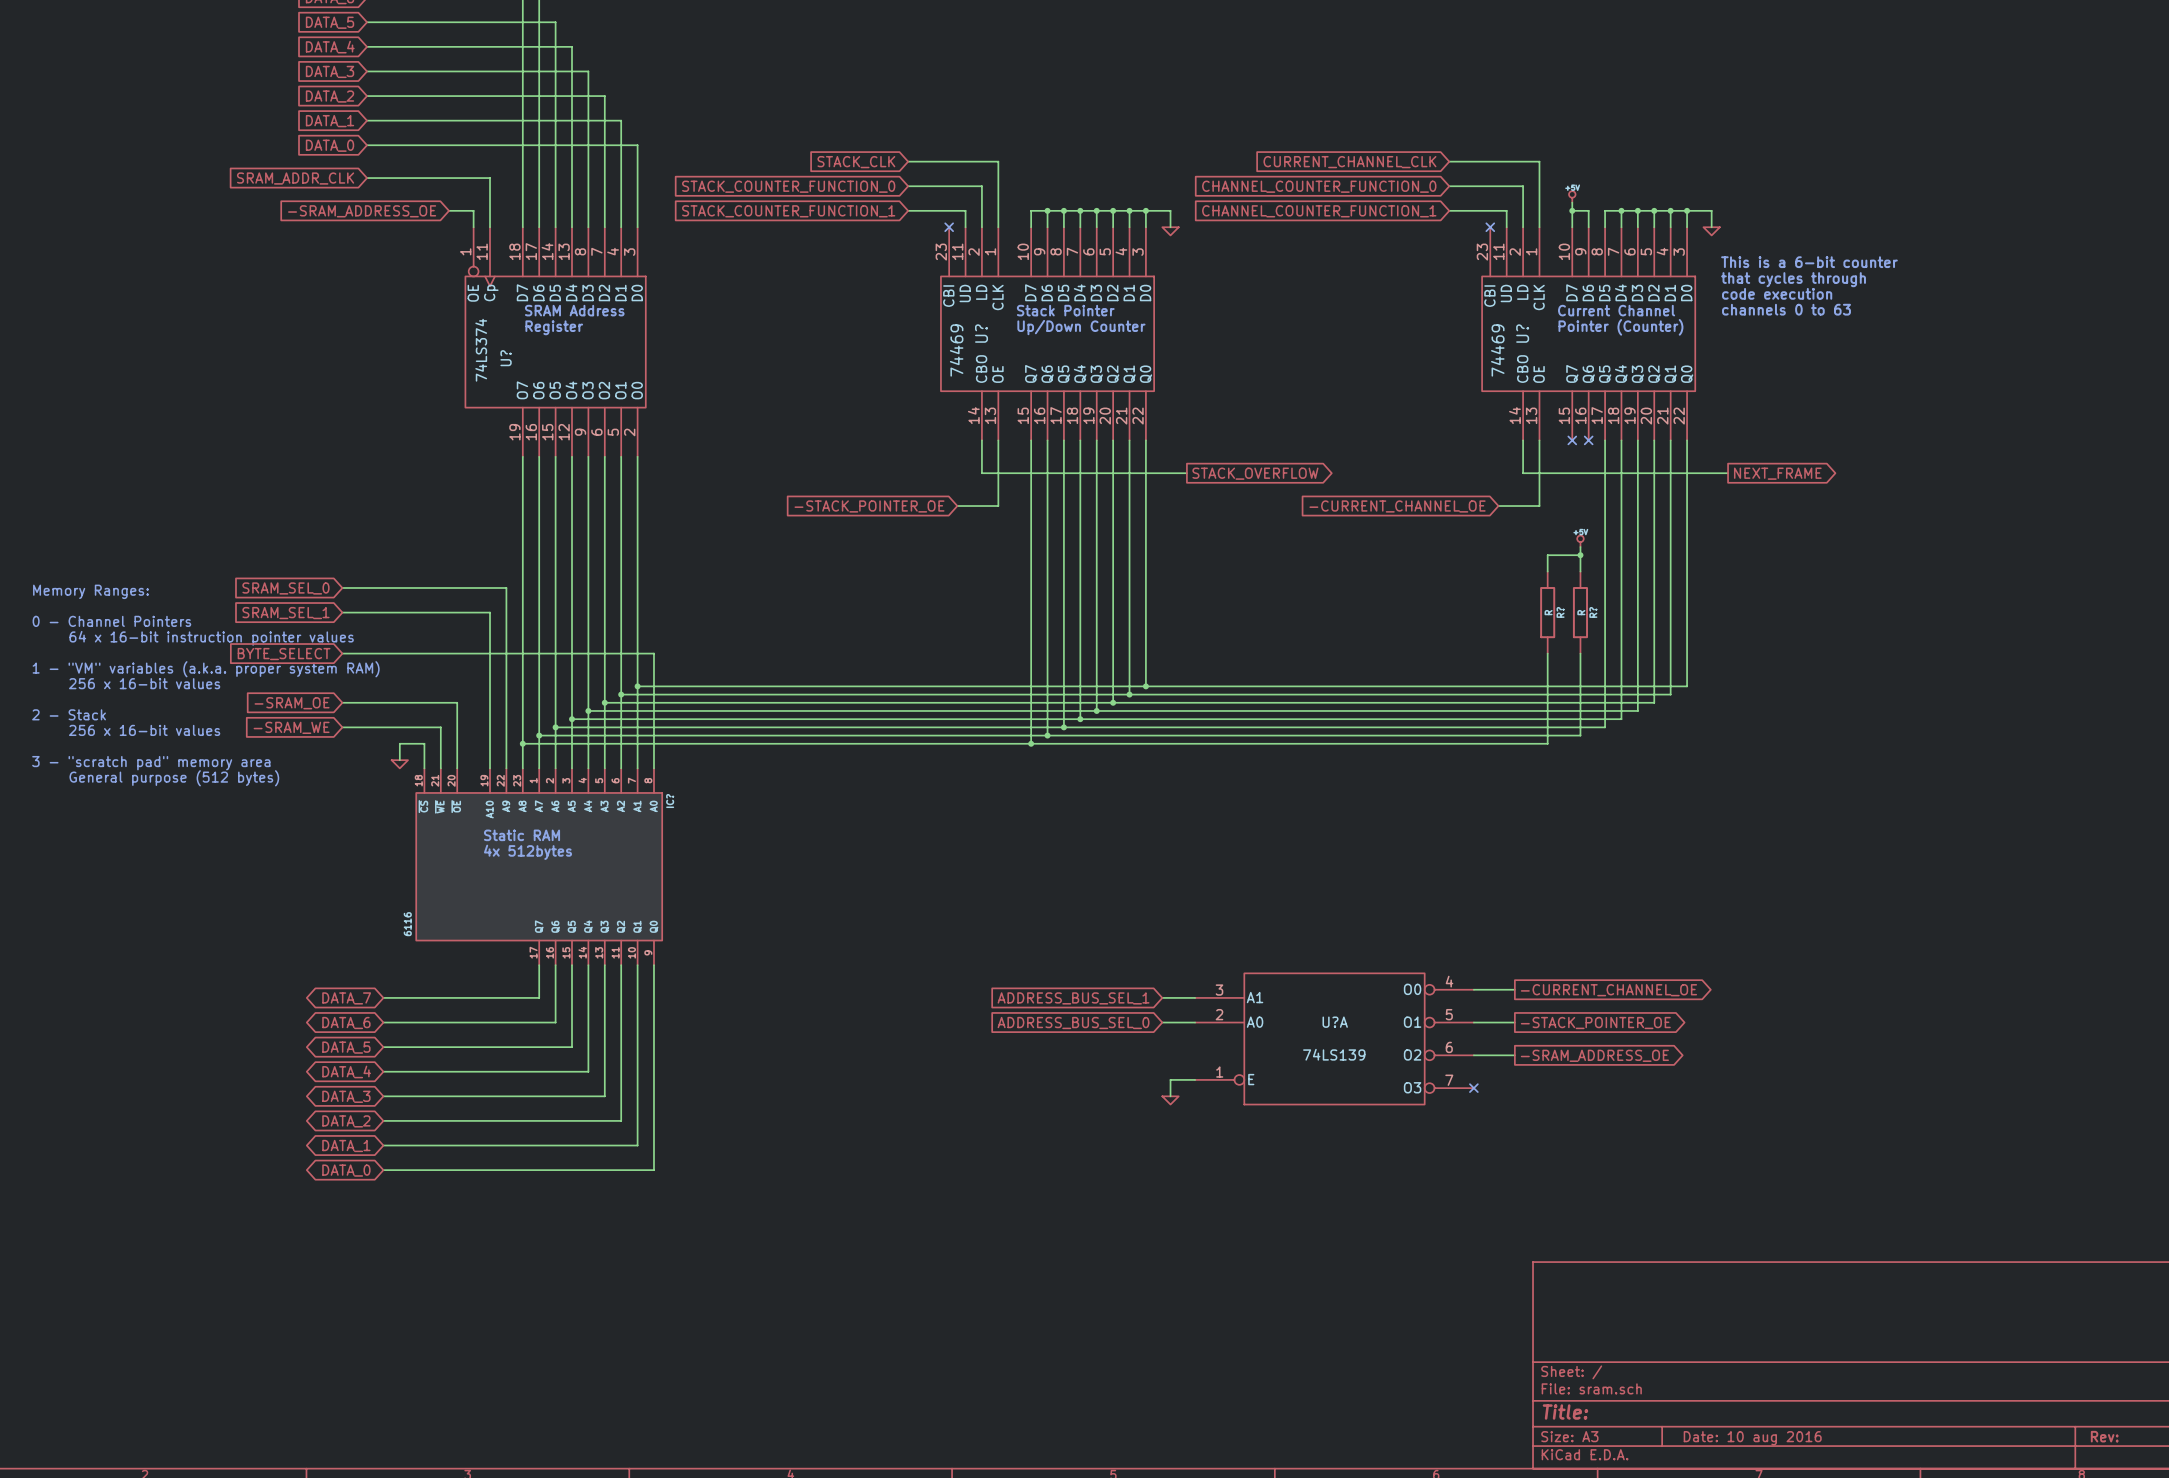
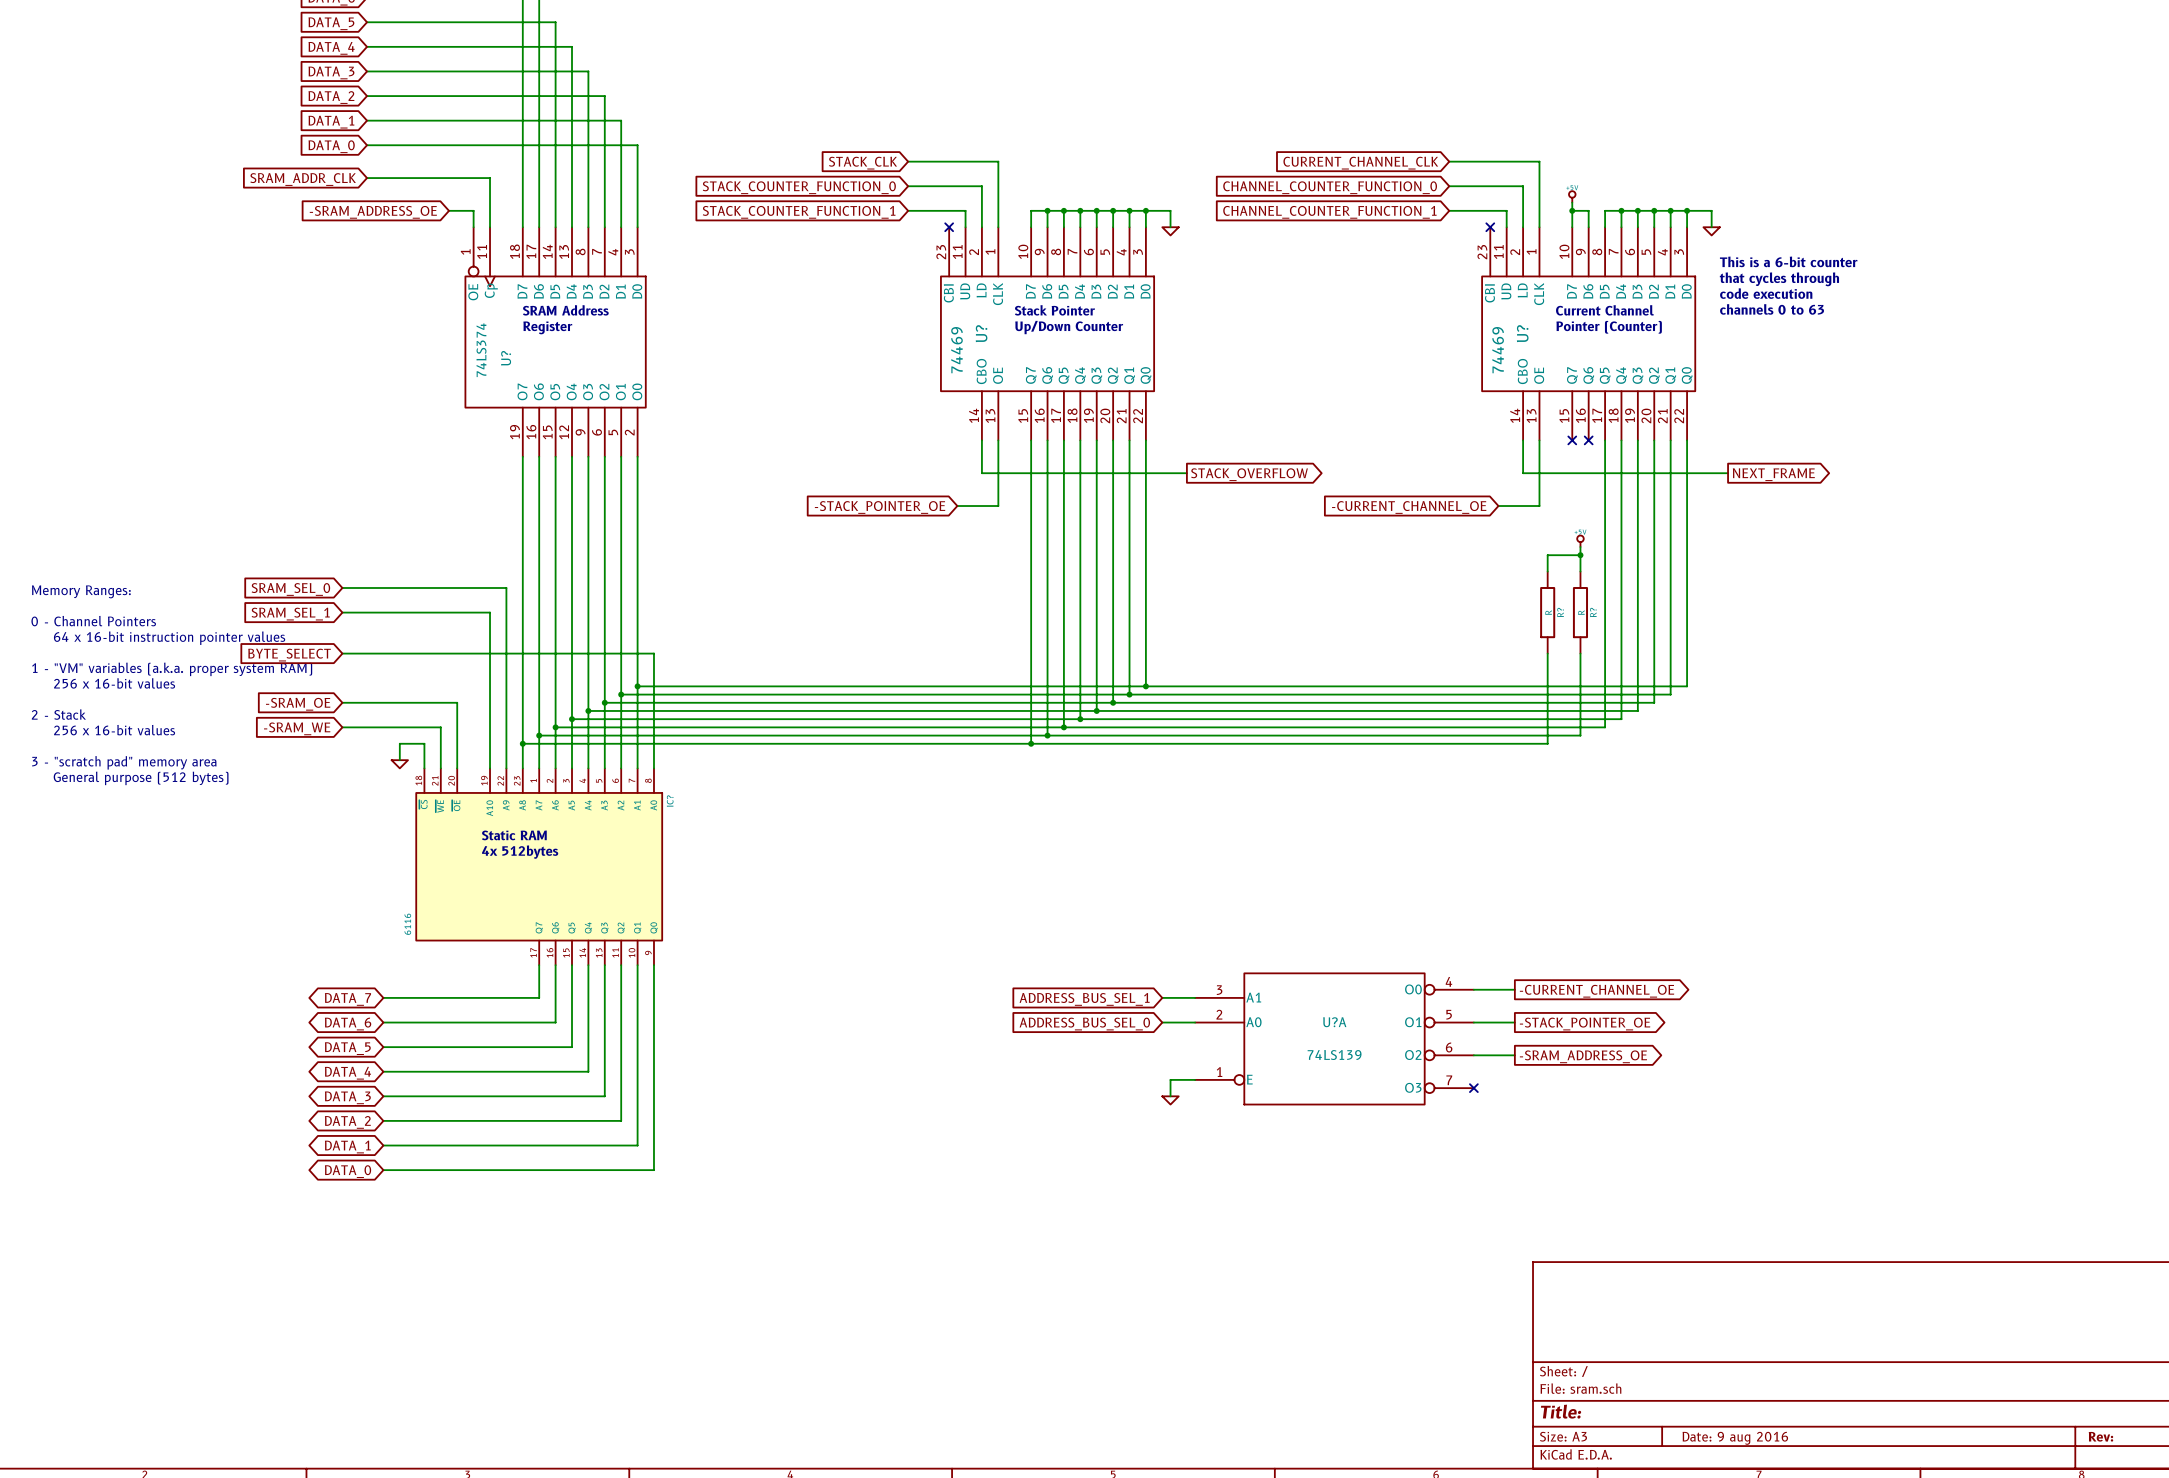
title block: Date: 10 aug 2016 (1752, 1438) -> Date: 9 aug 2016 (1735, 1438)

